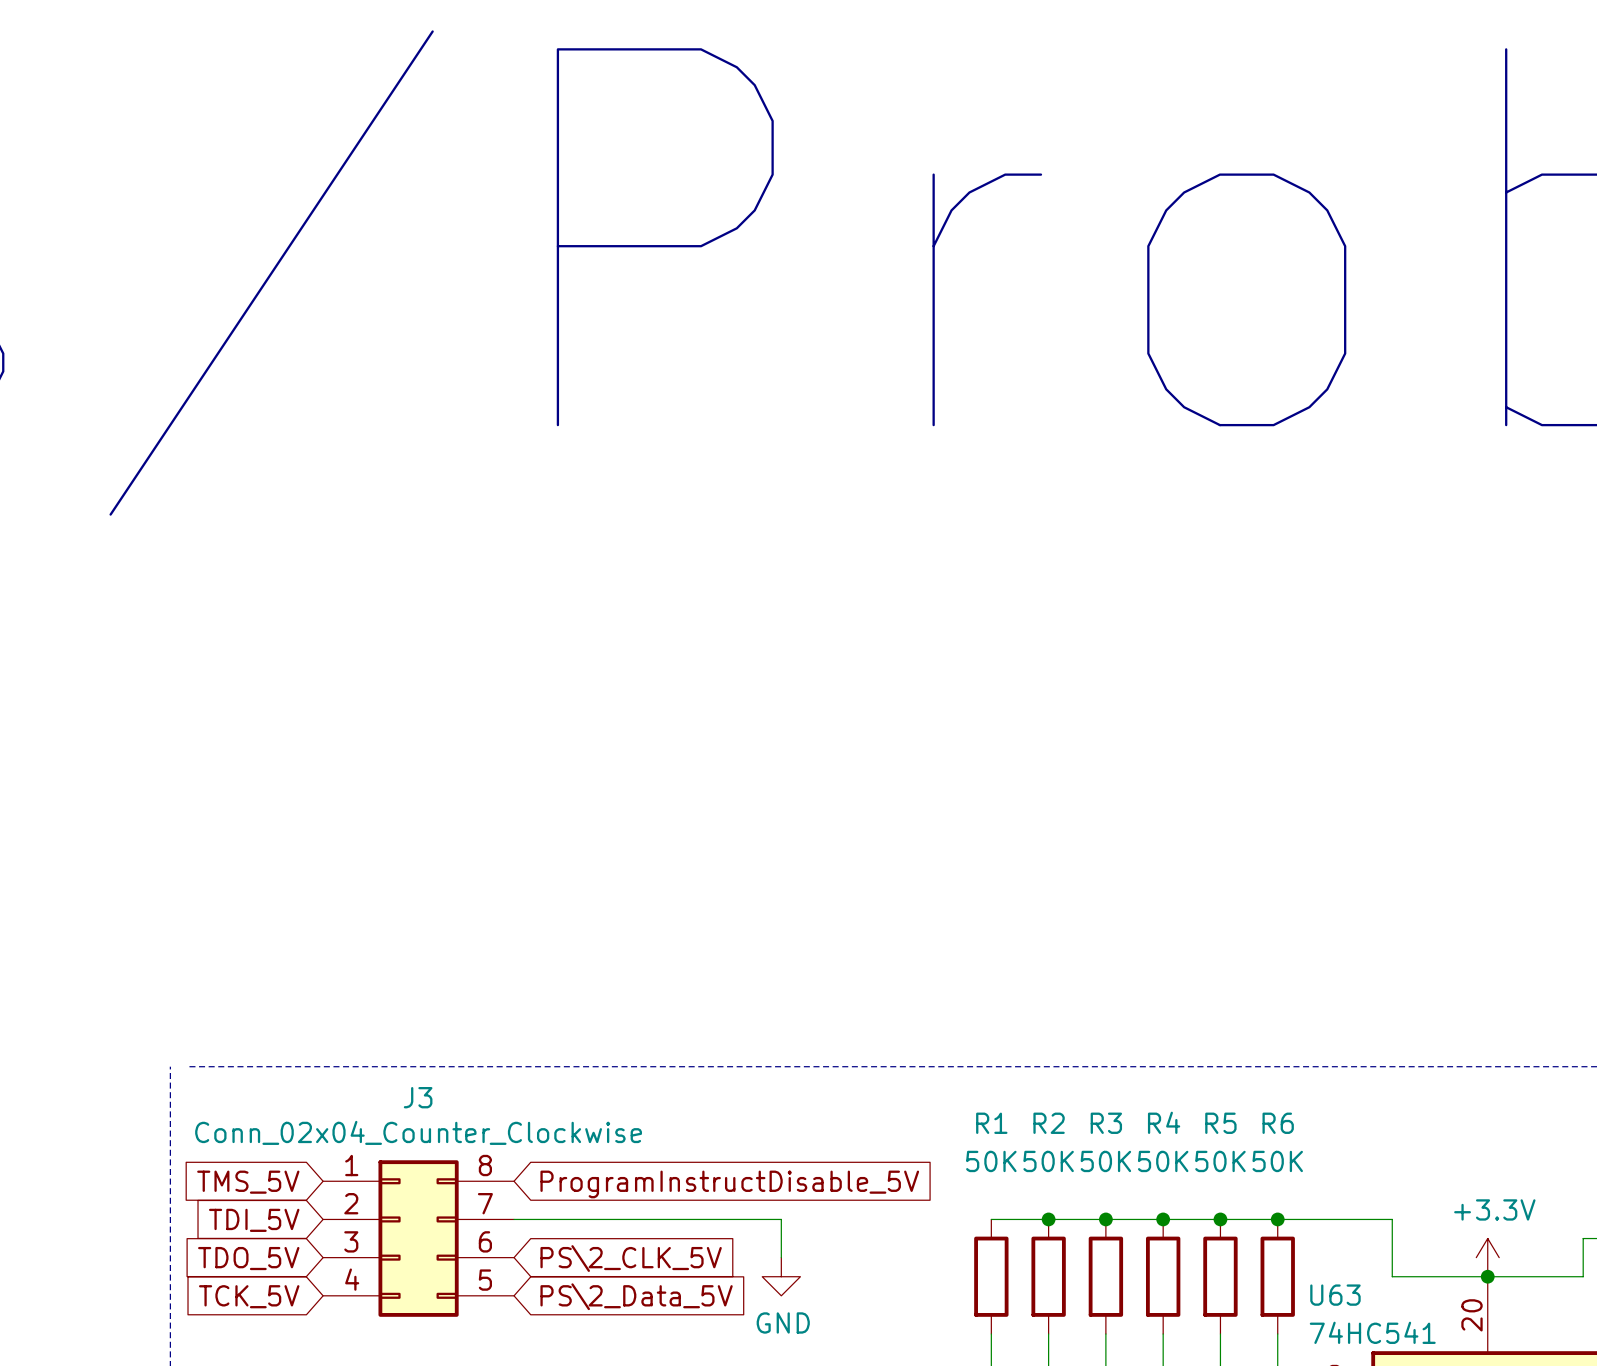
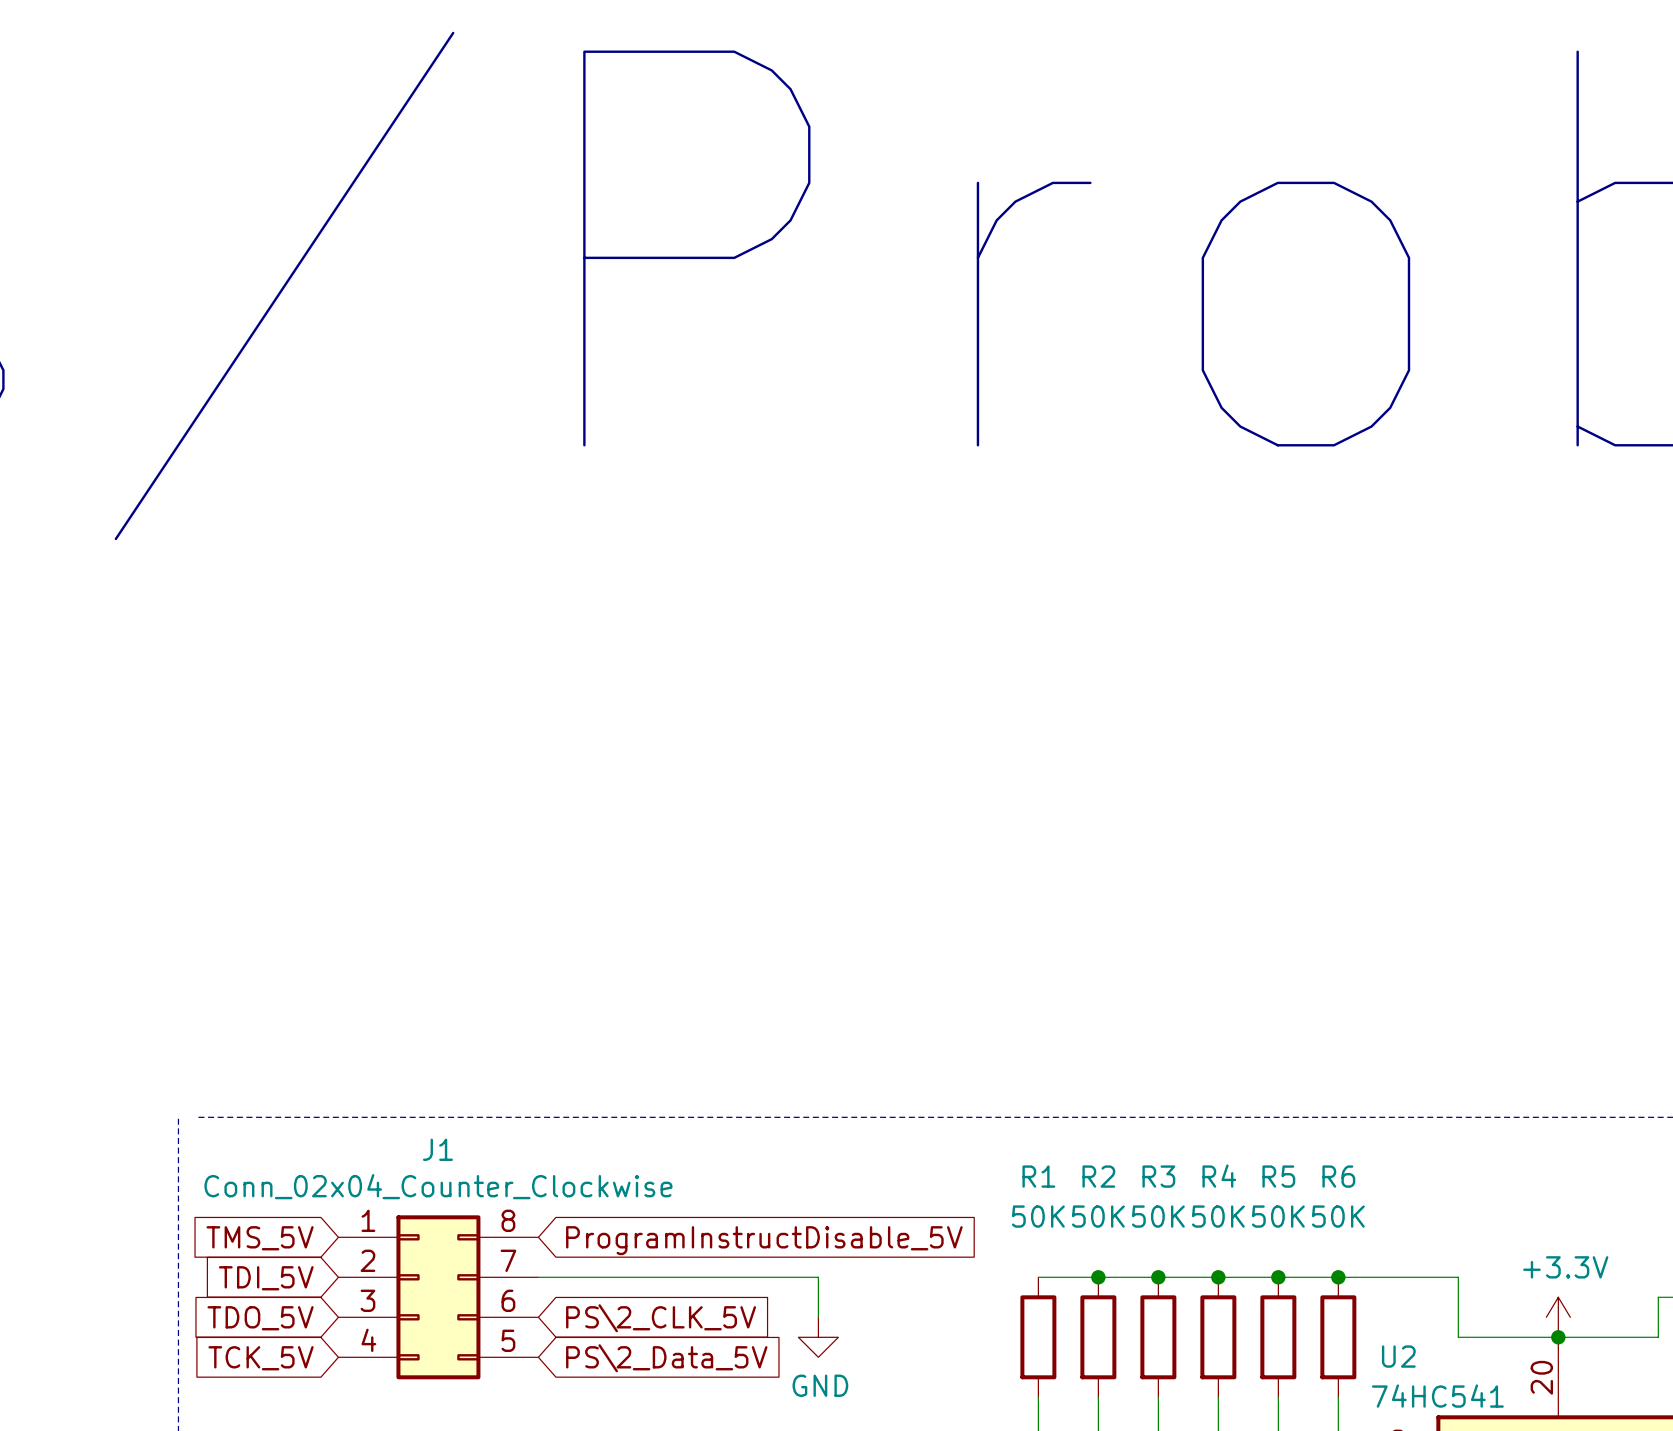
J3 name: J3 (418, 1097) -> J1 (437, 1149)
U63 name: U63 (1335, 1295) -> U2 (1398, 1356)

